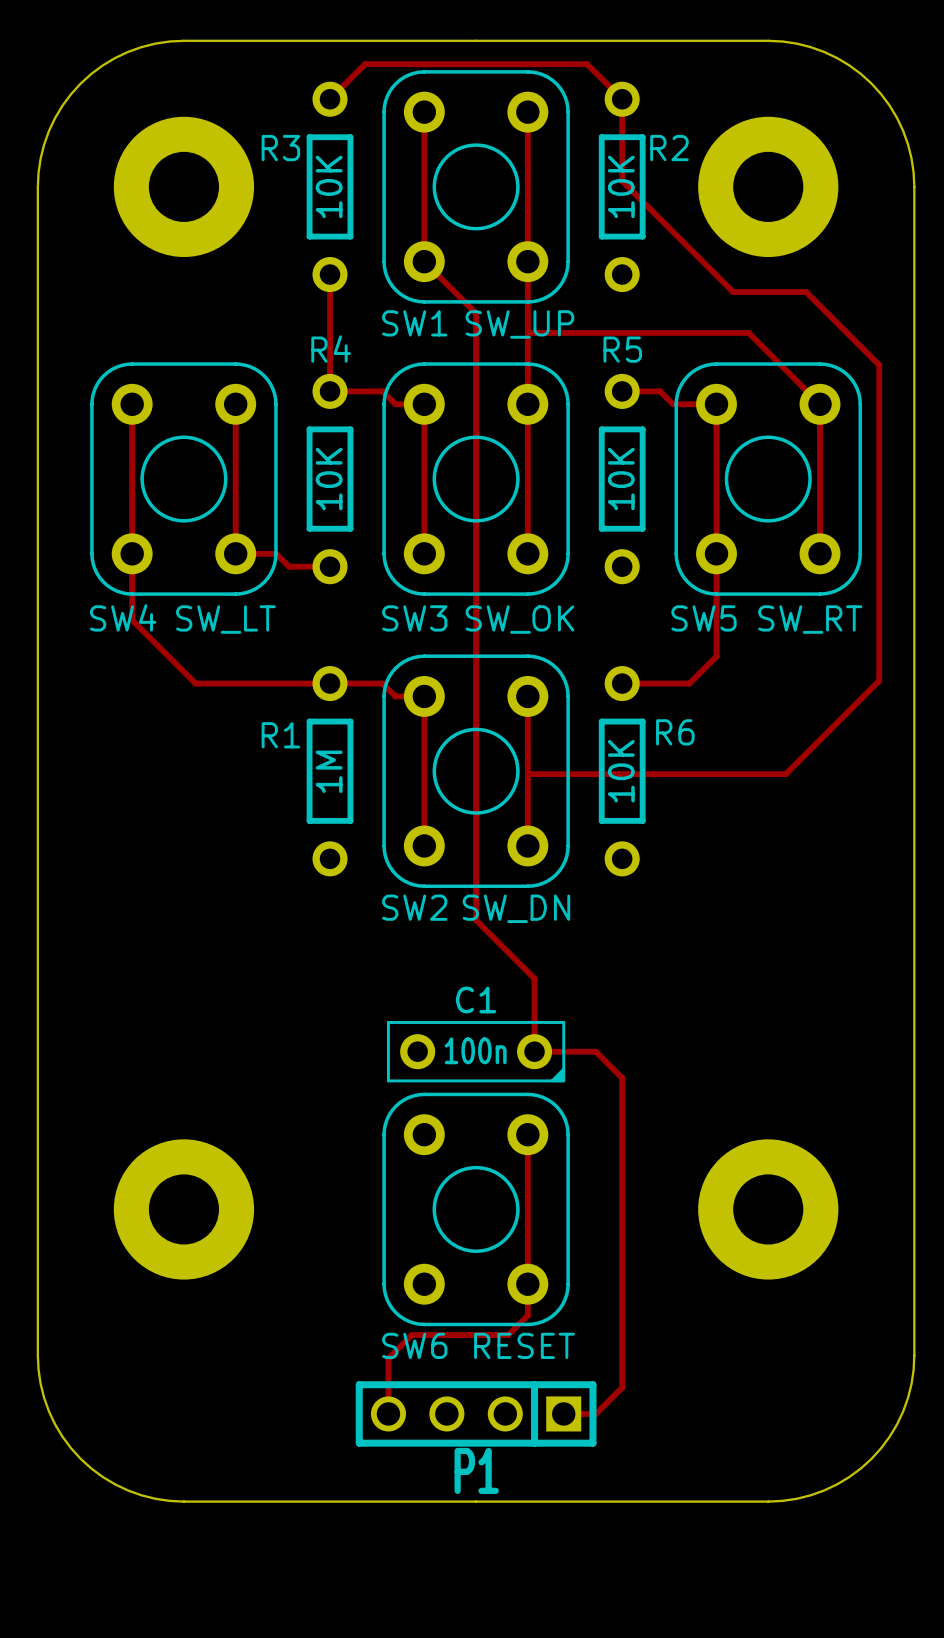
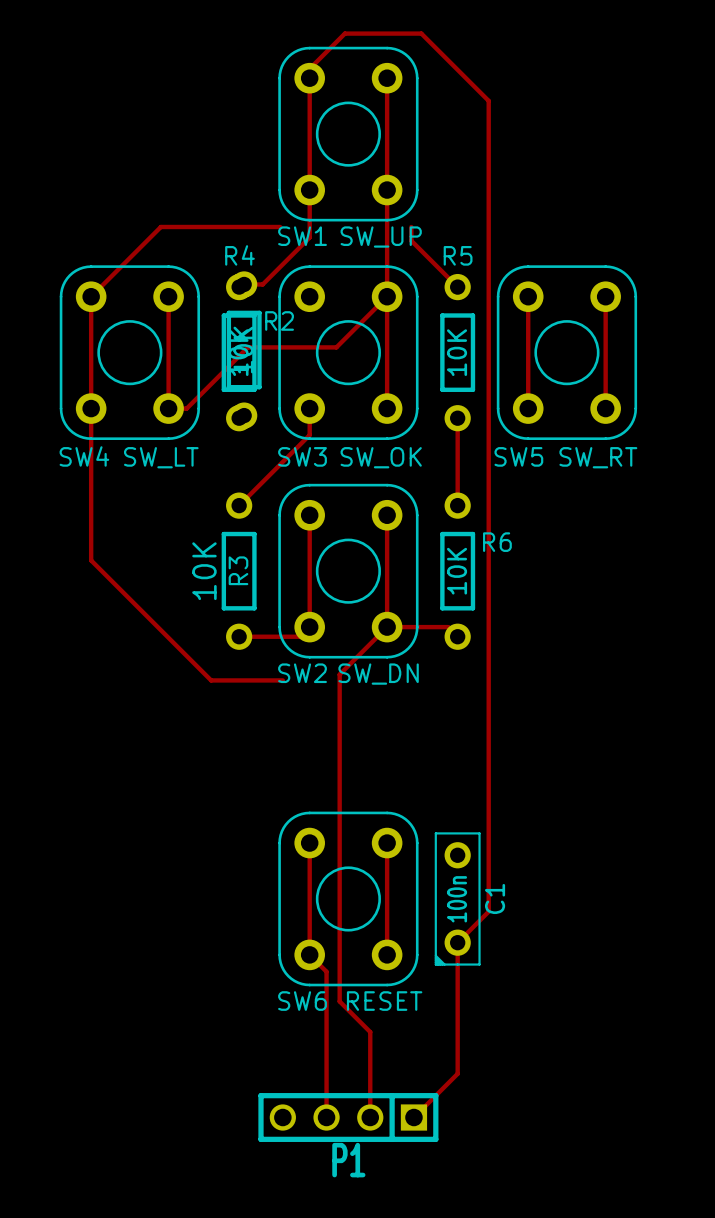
board edge: (183, 40) (782, 41) (810, 47) (849, 65) (881, 94) (903, 130) (911, 158) (914, 186) (913, 1369) (908, 1397) (889, 1436) (860, 1468) (824, 1490) (796, 1498) (768, 1501) (169, 1500) (128, 1490) (91, 1468) (71, 1448) (48, 1411) (40, 1384) (37, 1355) (38, 172) (44, 144) (55, 118) (80, 83) (102, 65) (128, 51) (155, 43) (183, 40) -> none
track: (330, 99) (365, 64) (587, 64) (622, 99) (622, 181) (733, 292) (806, 292) (879, 365) (879, 680) (785, 774) (527, 774) -> none
part: (183, 186) -> none
R3: 10K (330, 186) -> none
R2 position: (622, 186) -> (244, 350)
part: (768, 186) -> none
track: (424, 261) (476, 313) (476, 920) (534, 978) (534, 1051) (595, 1051) (622, 1077) (622, 1267) -> (309, 78) (309, 68) (344, 33) (421, 33) (488, 100) (488, 911) (457, 942)
track: none -> (309, 190) (309, 237) (262, 284) (244, 284)
track: (330, 274) (330, 391) (382, 391) (395, 404) (424, 404) (424, 553) -> (239, 505) (309, 435) (309, 408)
track: none -> (280, 226) (160, 226) (91, 296)
track: (527, 332) (748, 332) (820, 404) -> none
track: (622, 391) (660, 391) (673, 404) (716, 404) -> (457, 287) (411, 240) (411, 226)
track: (259, 553) (276, 553) (289, 566) (330, 566) -> (186, 408) (247, 347) (336, 347) (387, 296)
track: (716, 553) (716, 656) (689, 683) (622, 683) -> (457, 418) (457, 505)
track: (132, 620) (195, 683) (382, 683) (395, 696) (424, 696) -> (91, 458) (91, 560) (211, 680) (282, 680)
R1 name: R1 (280, 735) -> R3 (238, 570)
R1 value: 1M (329, 771) -> 10K (204, 571)
track: none -> (309, 627) (300, 636) (239, 636)
track: none -> (457, 636) (448, 627) (387, 627) (339, 674) (339, 1001) (370, 1032) (370, 1117)
C1 rotation: 0° (476, 1051) -> 90° clockwise (457, 898)
C1 position: (476, 1051) -> (457, 898)
track: none -> (309, 843) (309, 954) (326, 971) (326, 1117)
part: (183, 1209) -> none
part: (768, 1209) -> none
track: (527, 1284) (527, 1315) (508, 1335) (411, 1335) (388, 1358) (388, 1413) -> none
track: (622, 1387) (595, 1413) (563, 1413) -> (457, 1032) (457, 1073) (413, 1117)
P1 position: (476, 1413) -> (348, 1117)

